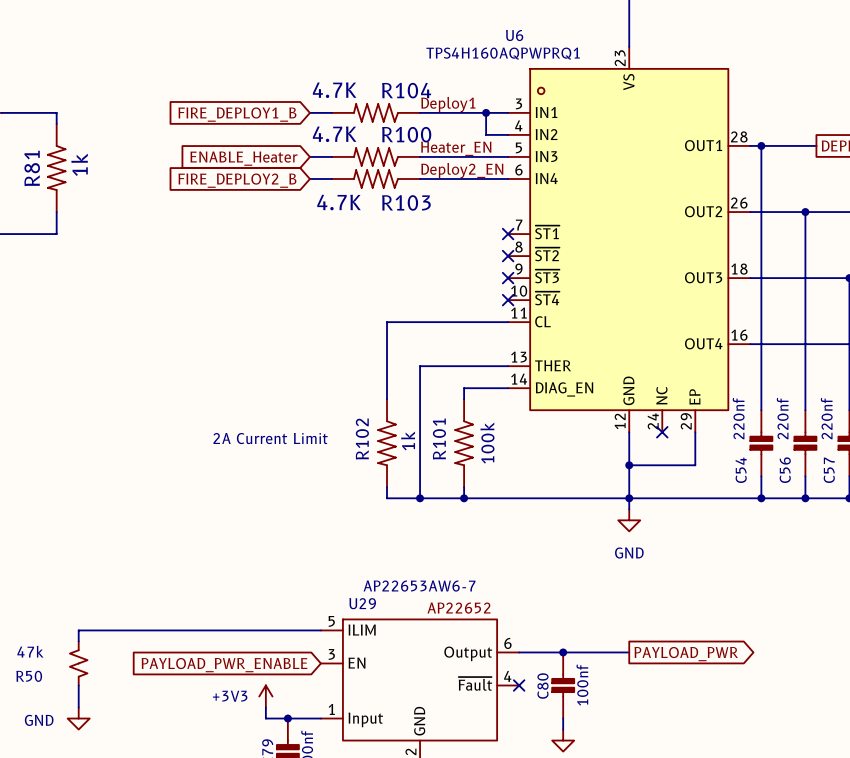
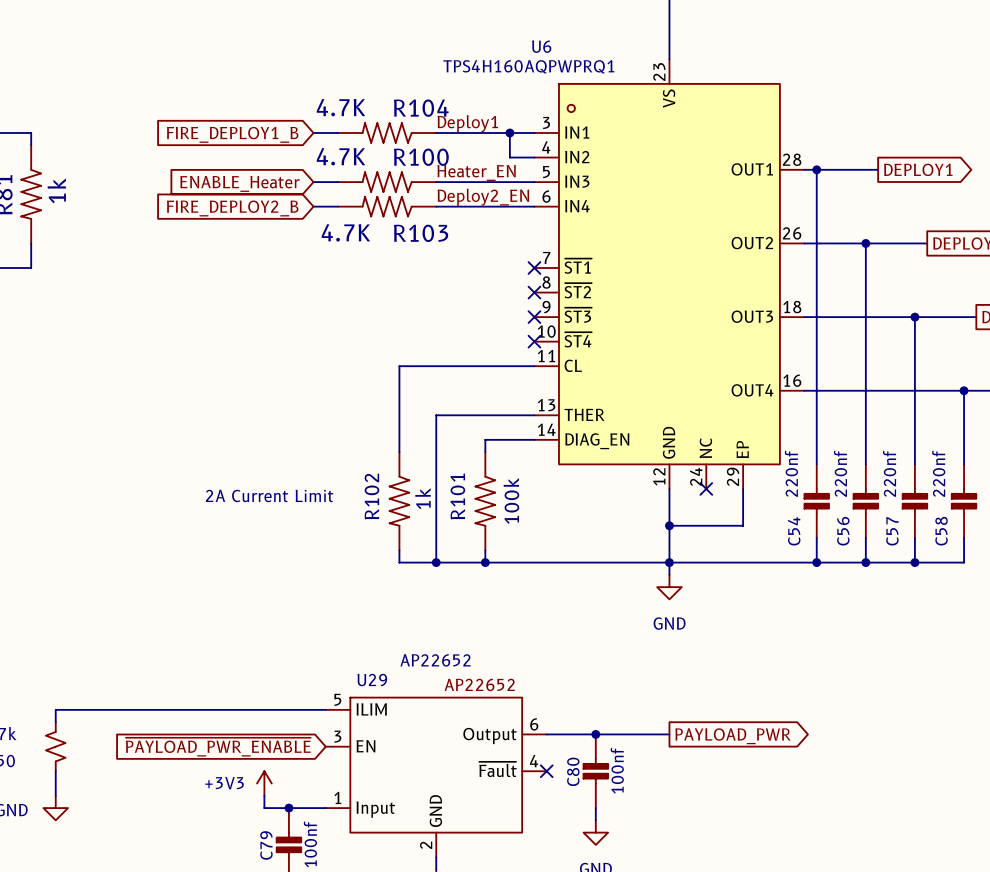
U29 value: AP22653AW6-7 (419, 586) -> AP22652 (435, 660)
global label: PAYLOAD_PWR_ENABLE (224, 665) -> ~{PAYLOAD_PWR_ENABLE} (218, 747)

